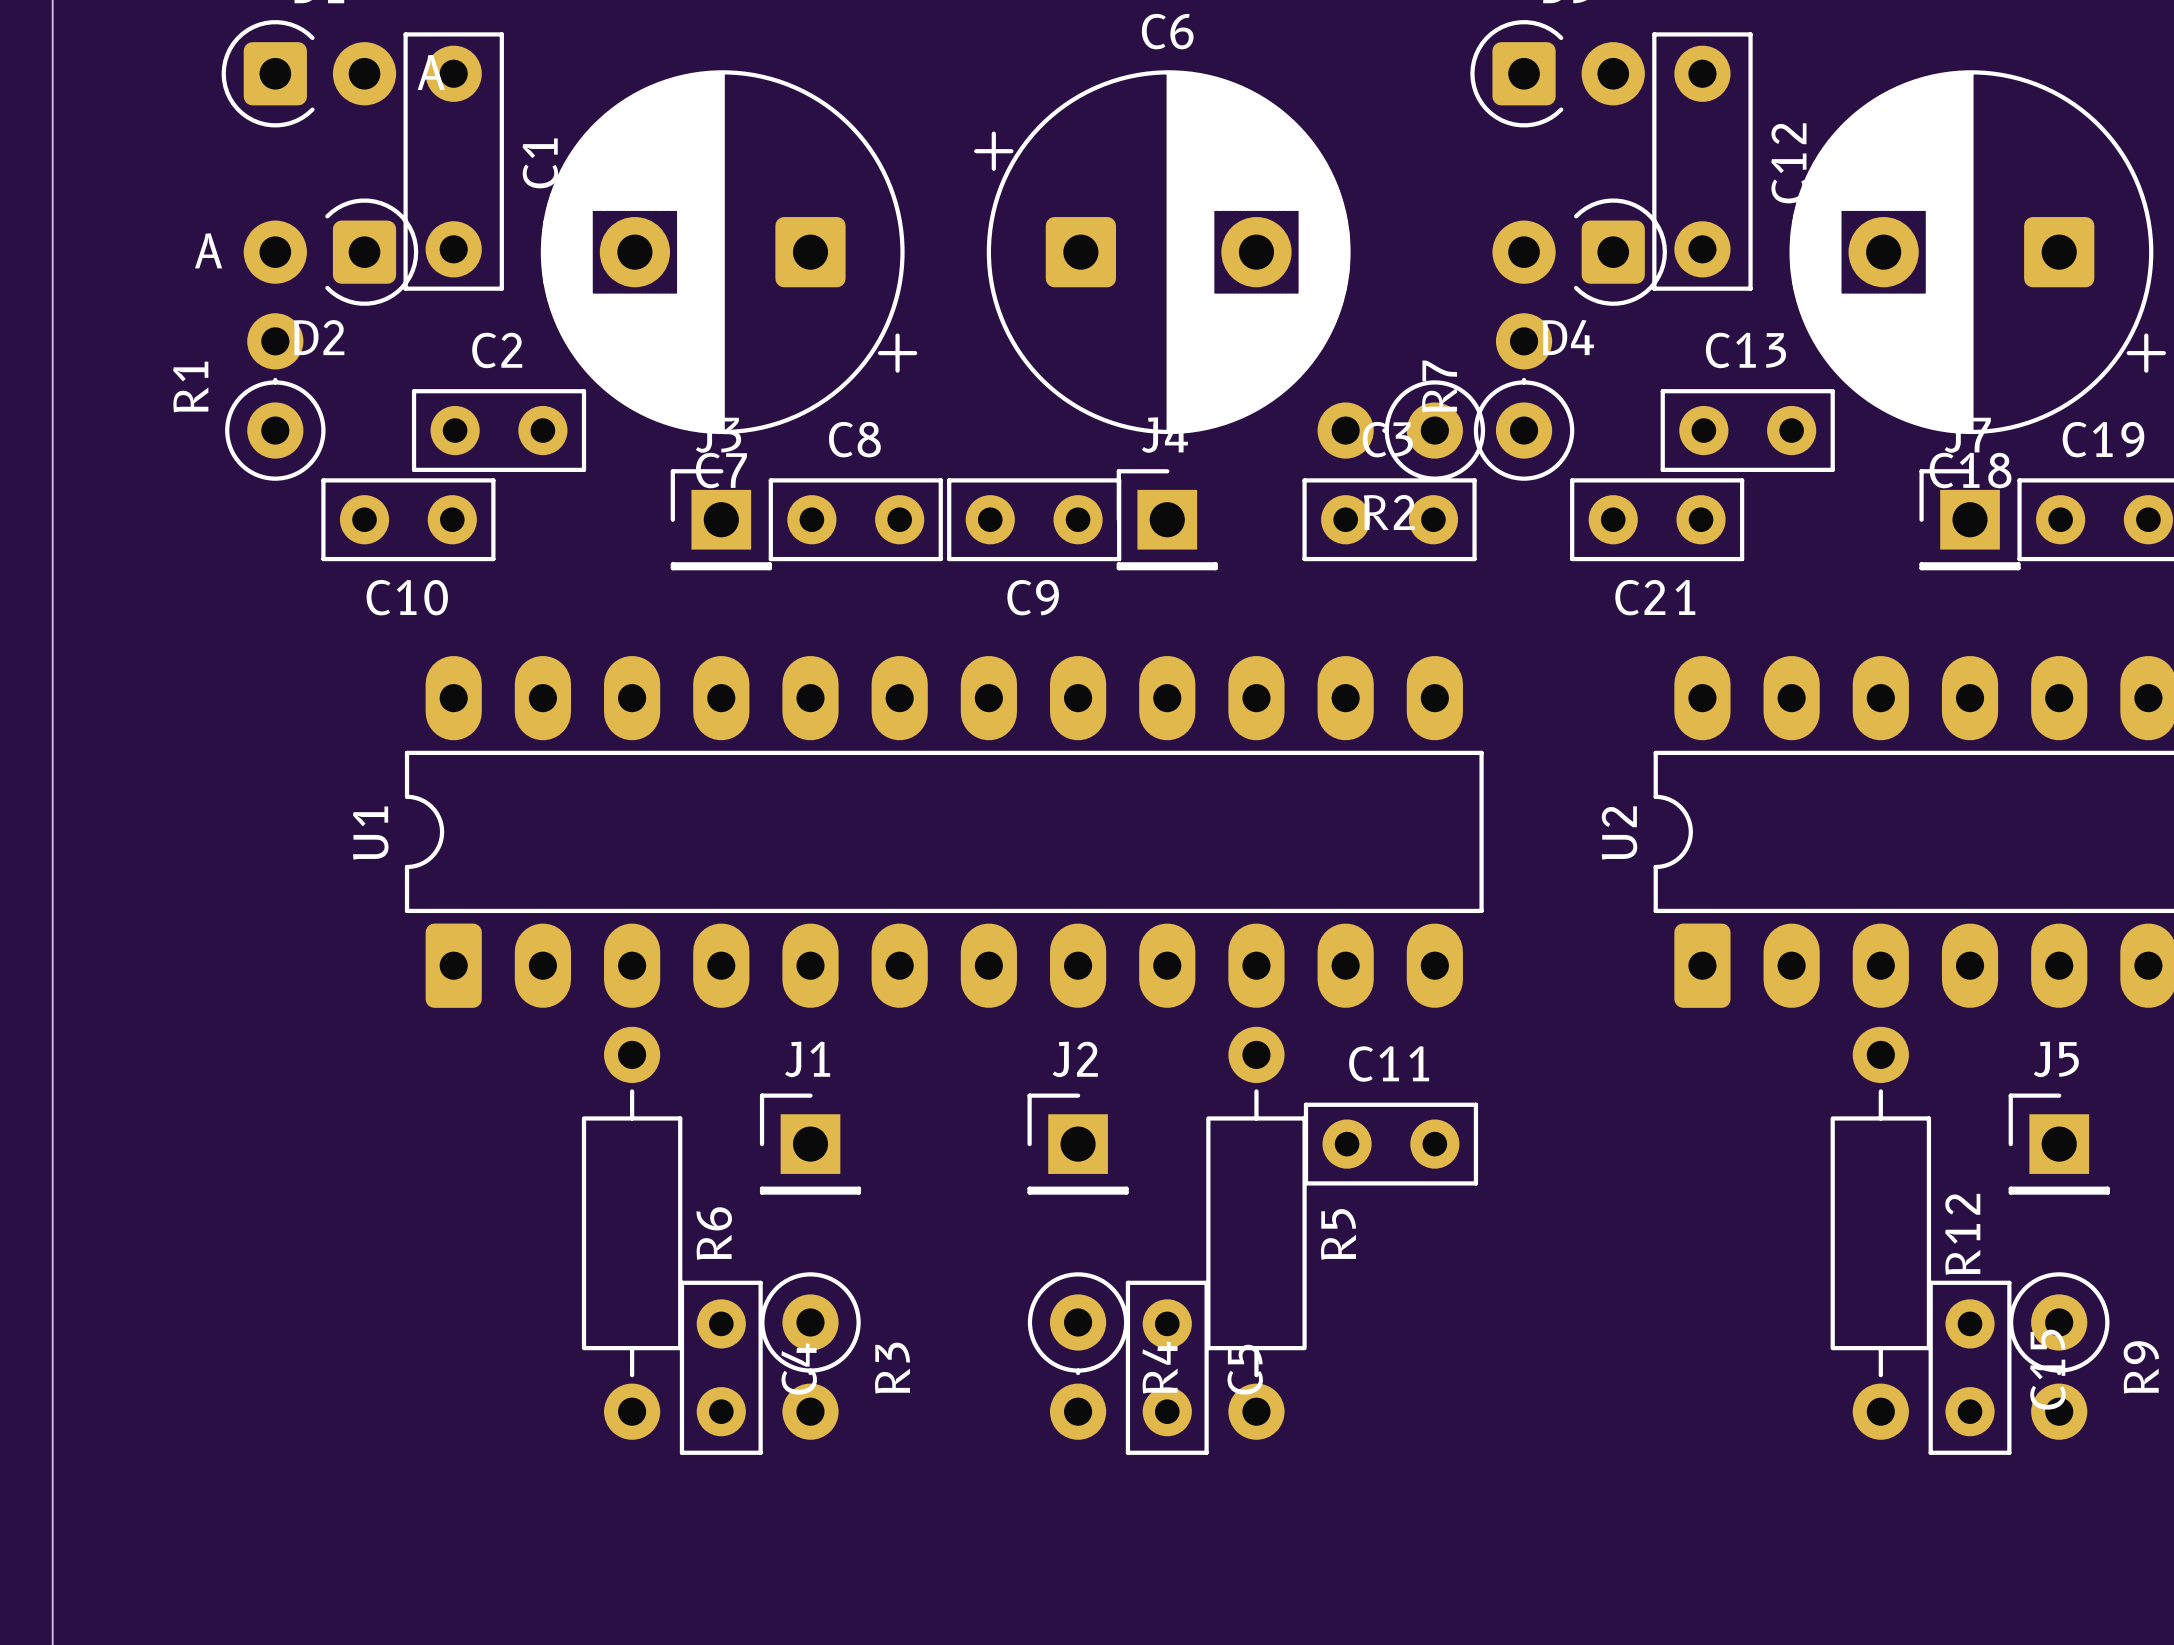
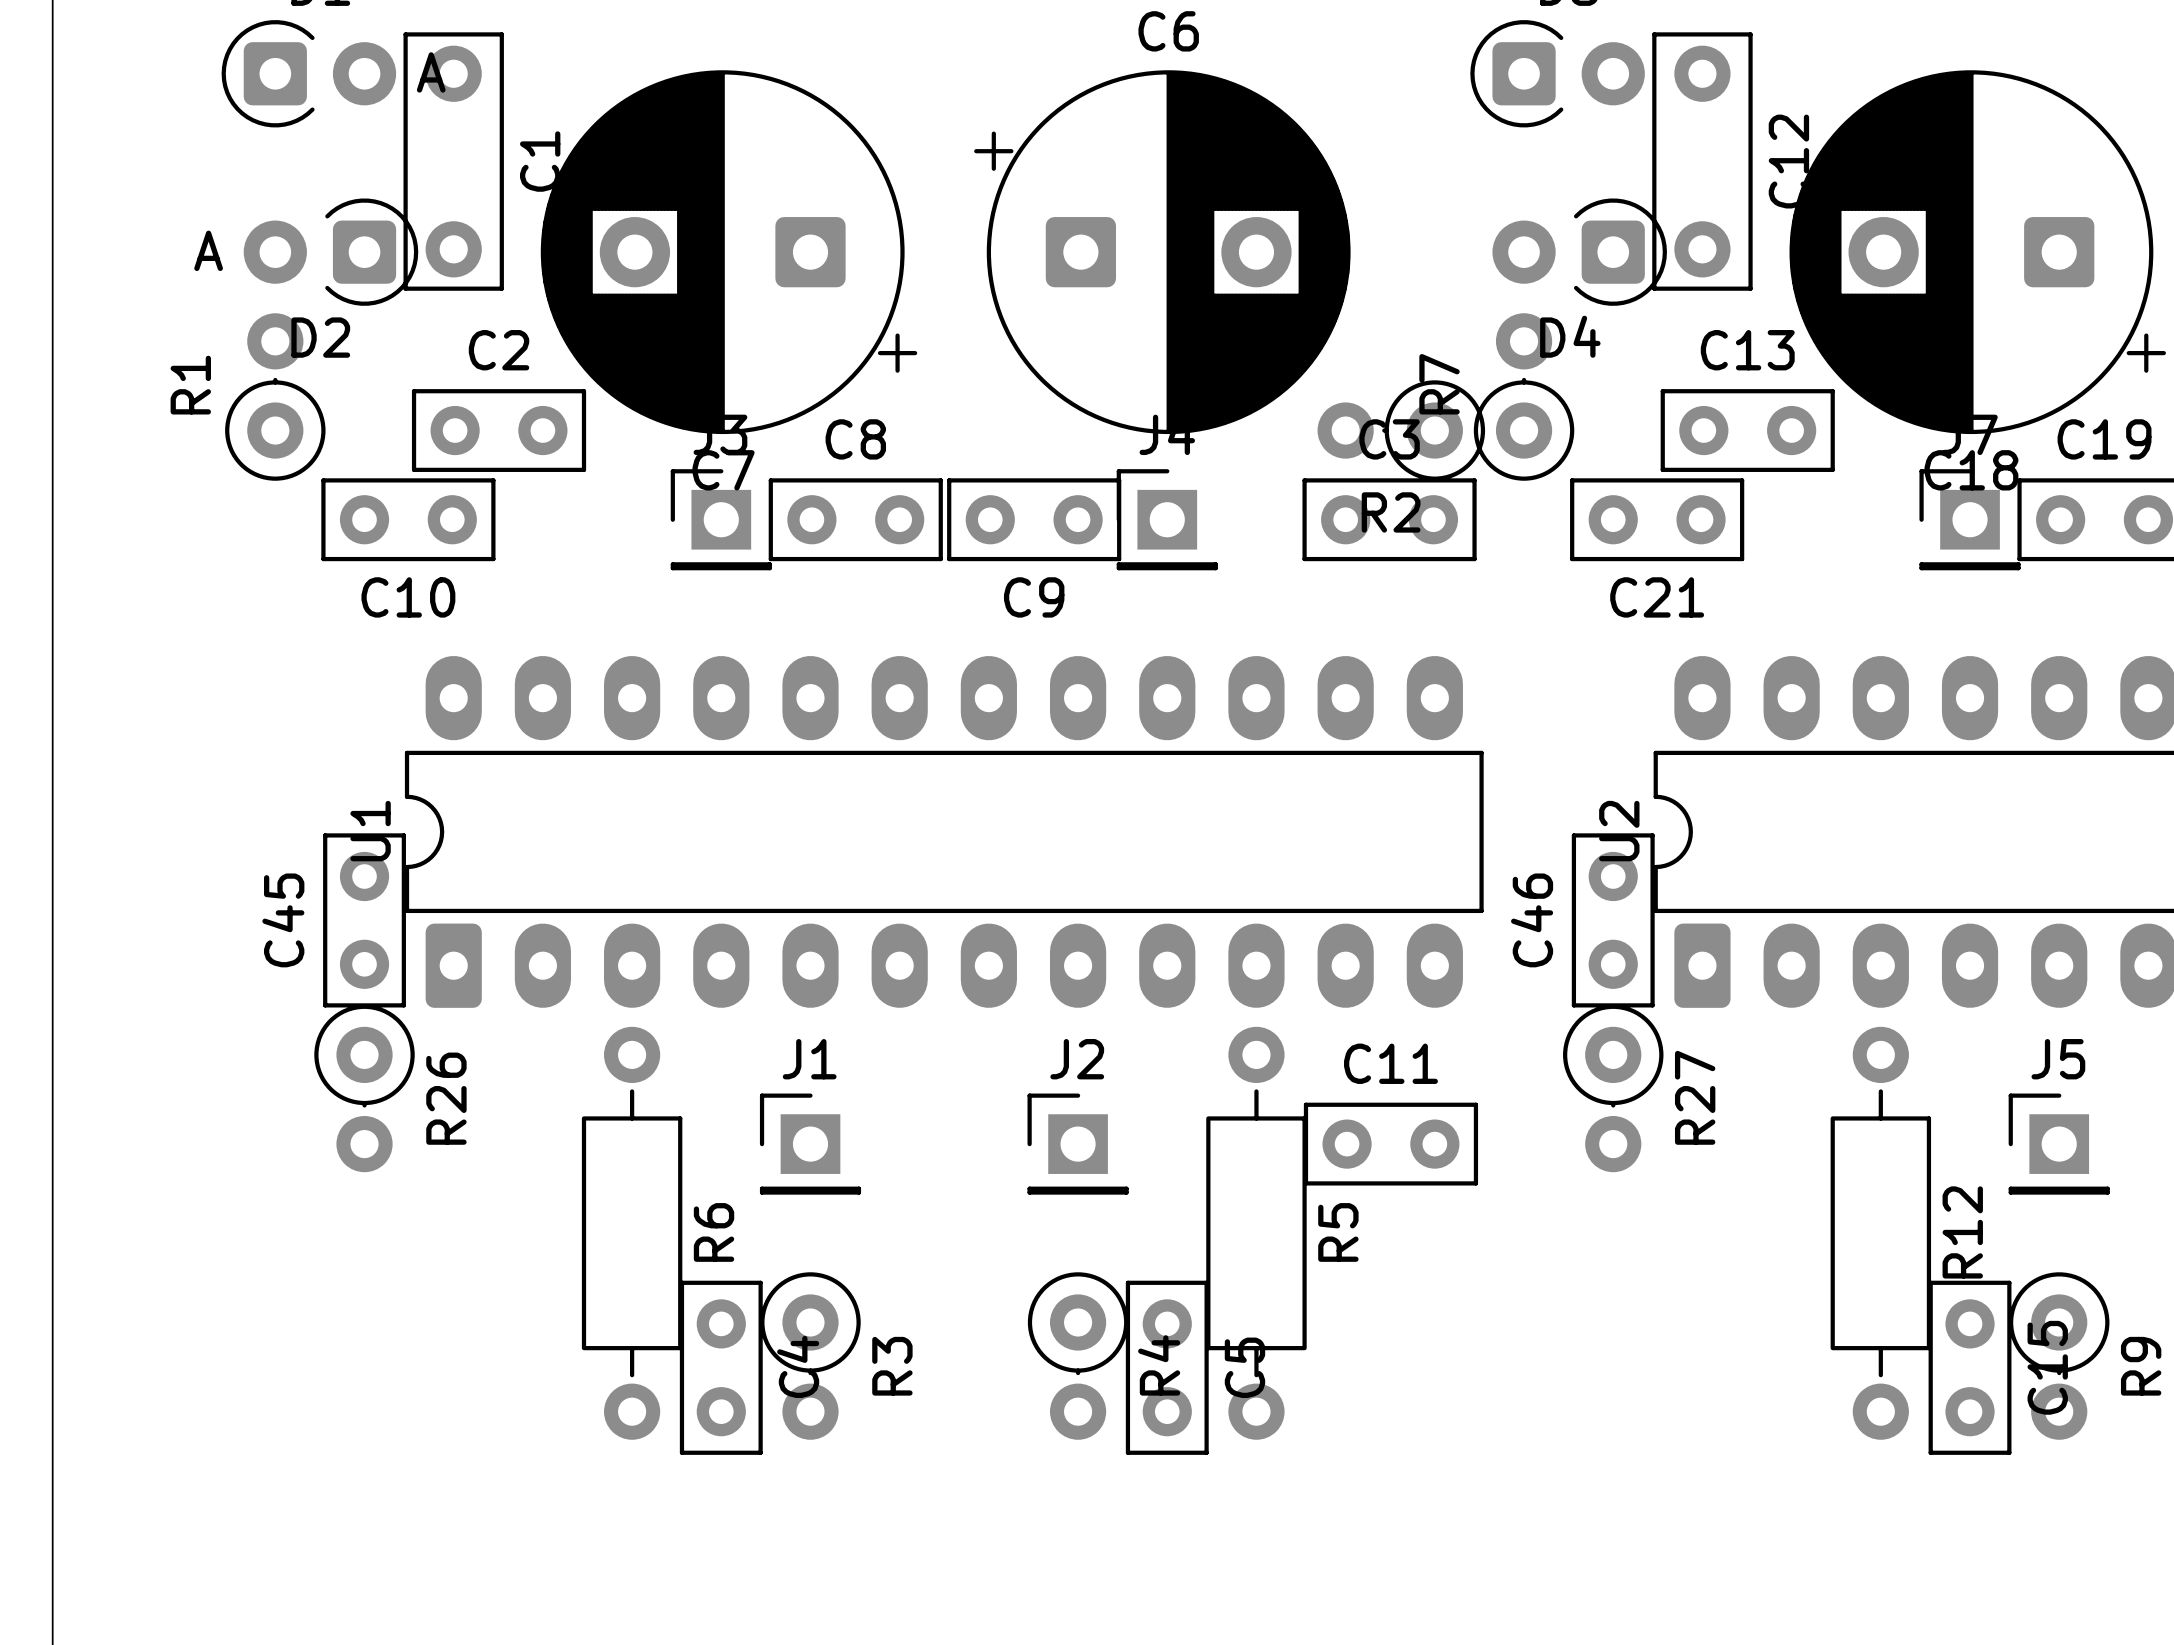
C45: none -> (364, 920)
C46: none -> (1613, 920)
R26: none -> (364, 1088)
R27: none -> (1613, 1088)

